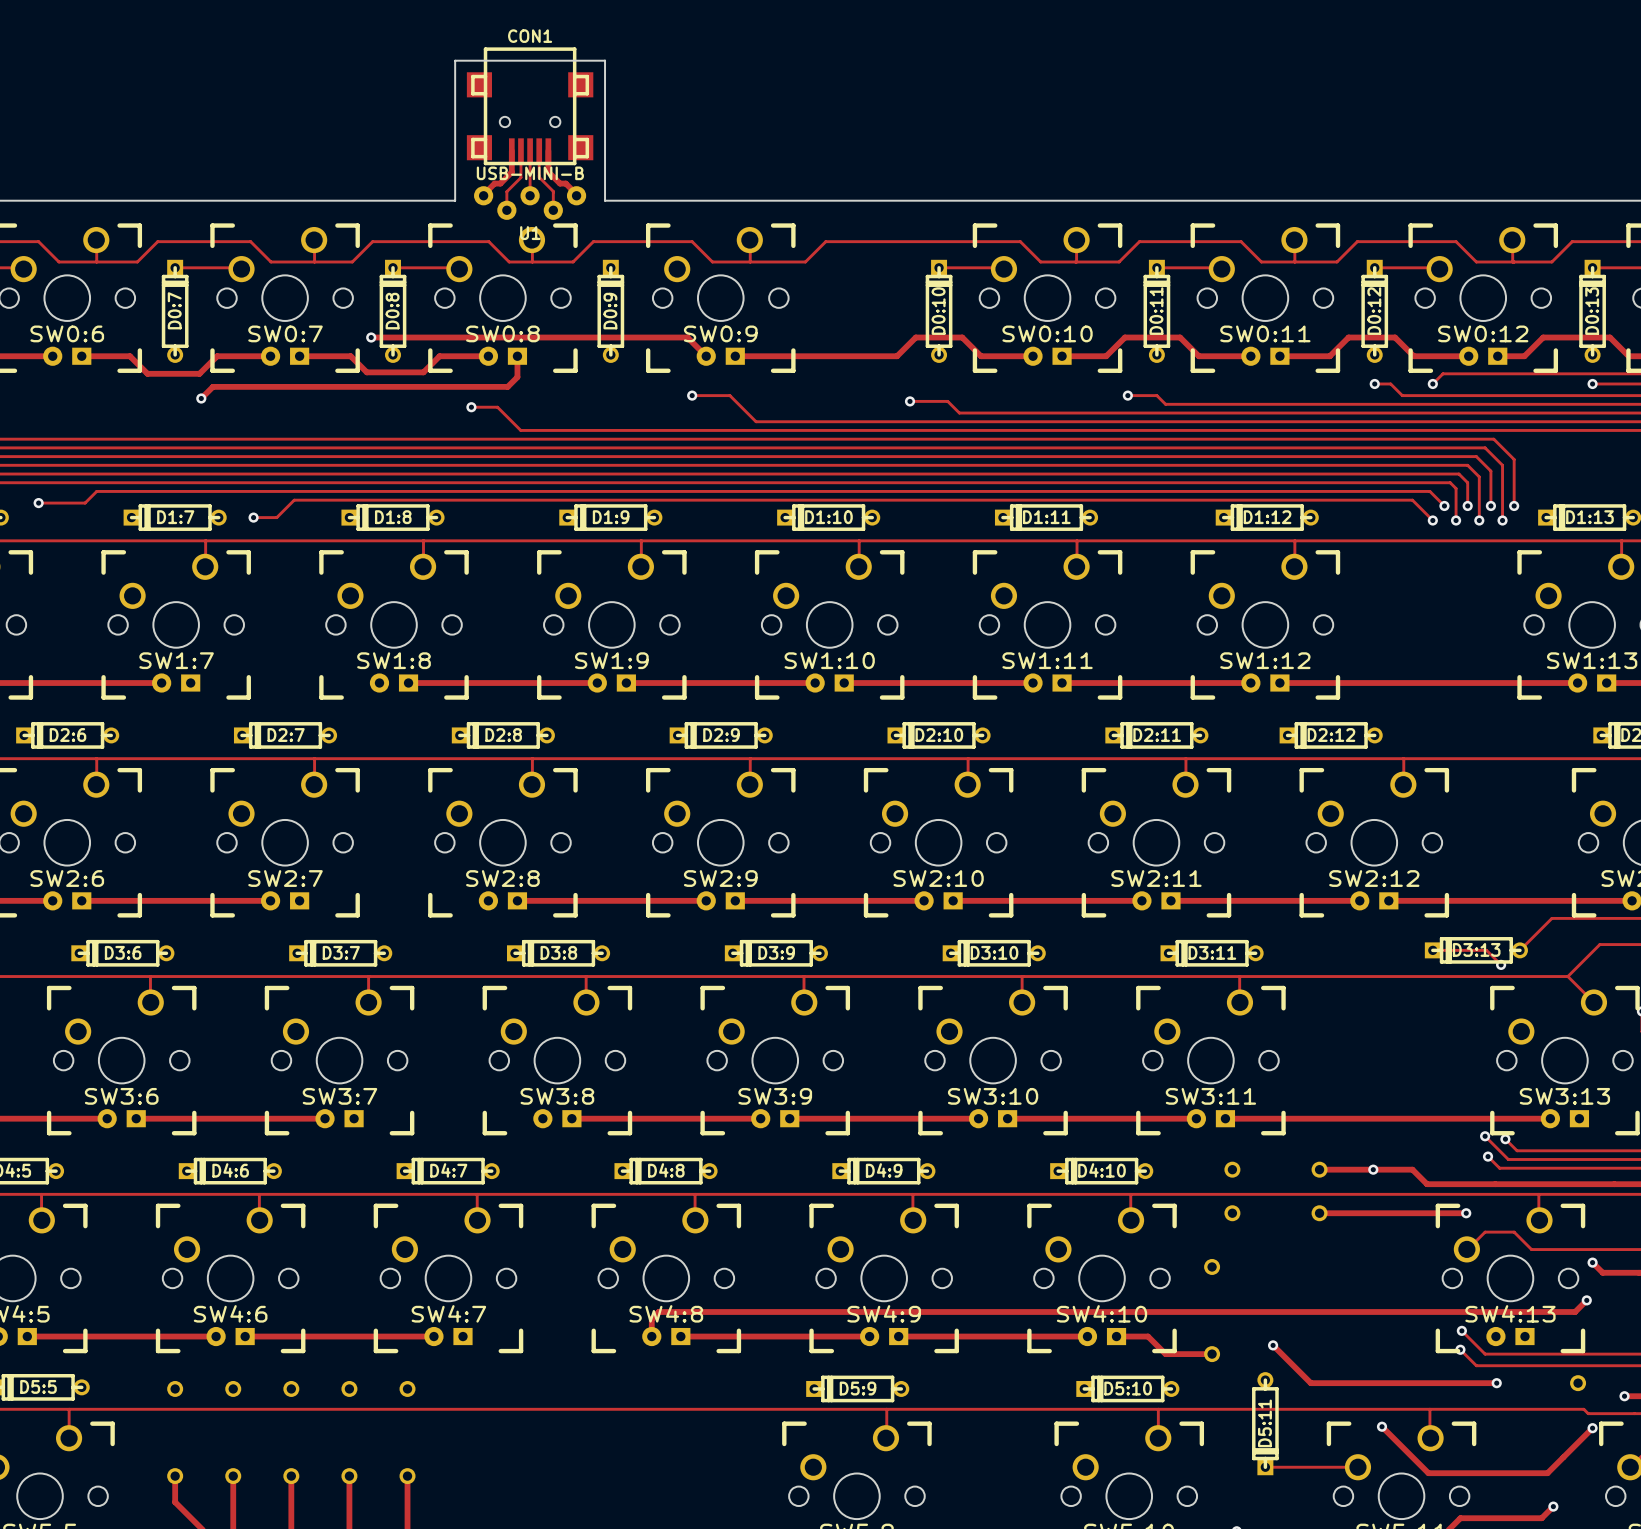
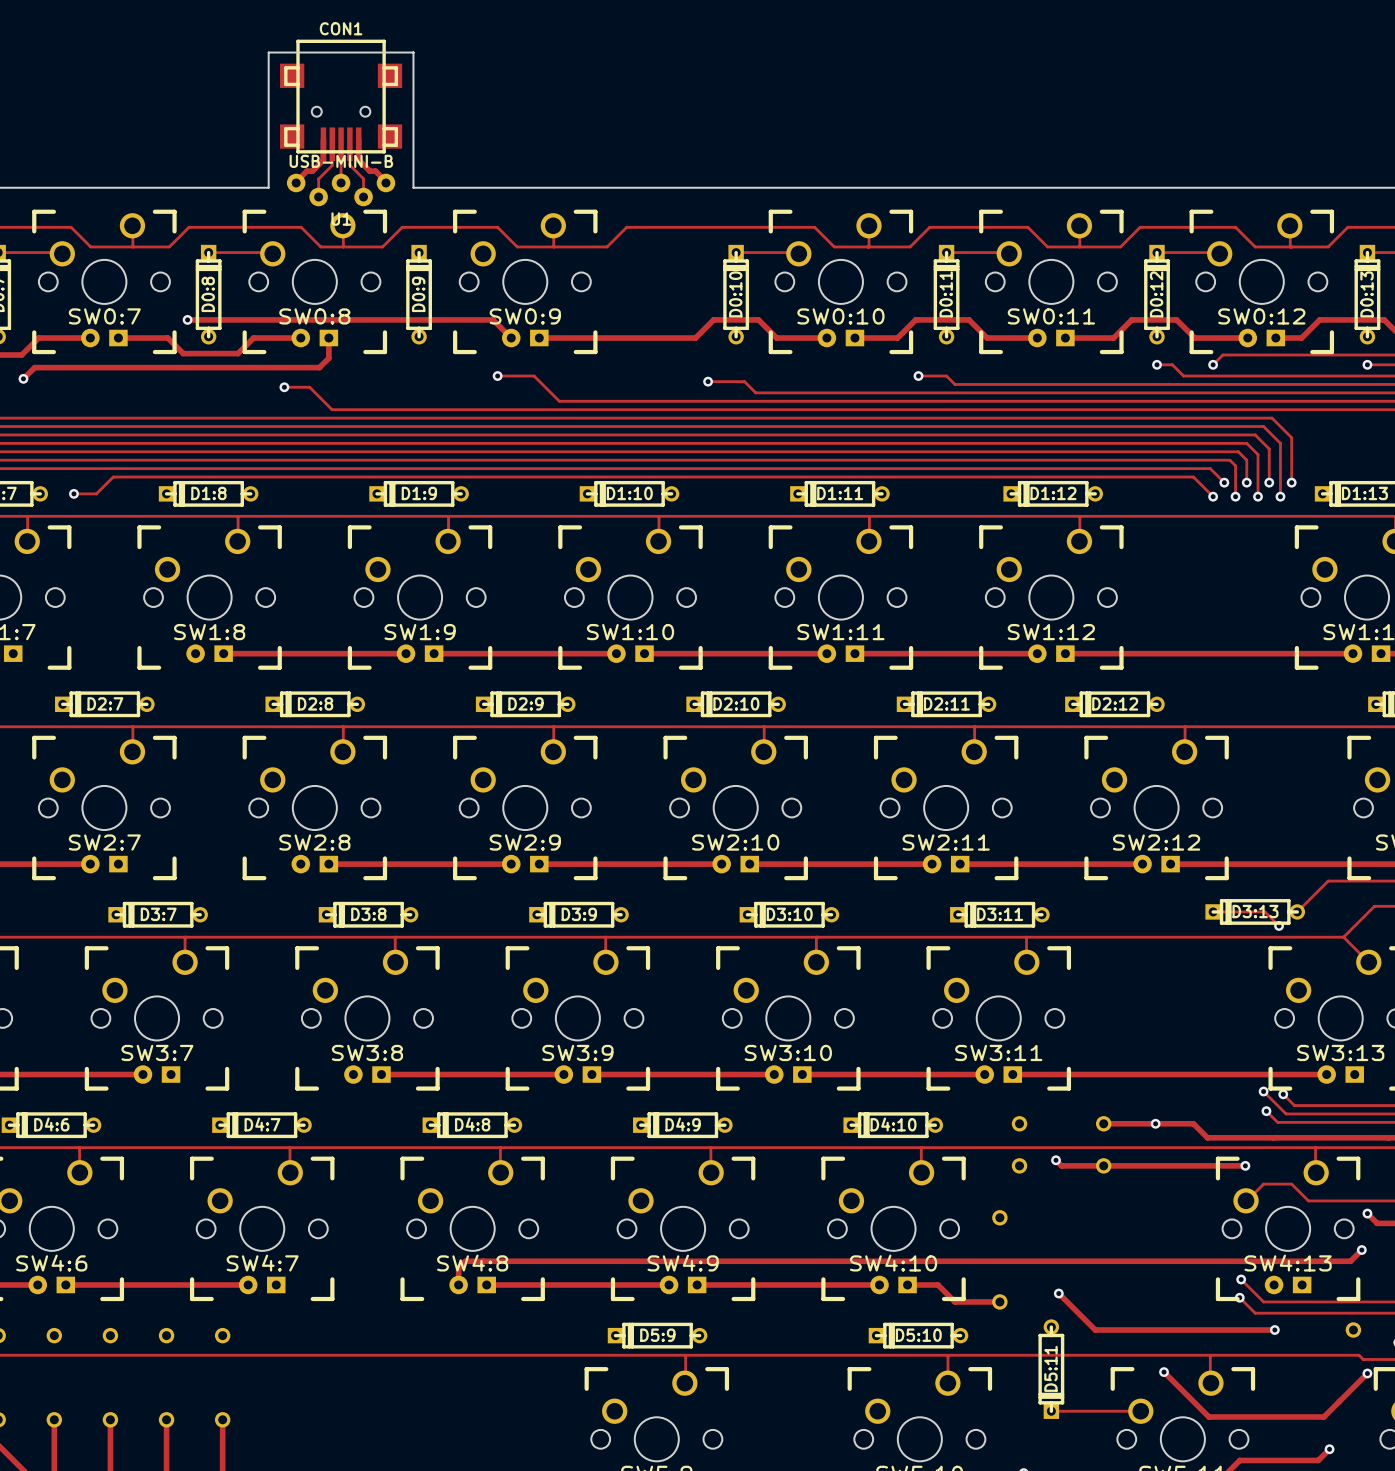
CON1 footprint: [466, 47, 594, 166] -> [280, 39, 403, 162]
track: none -> (1055, 1160) (1061, 1165) (1103, 1165)
via: none -> (1055, 1160)

